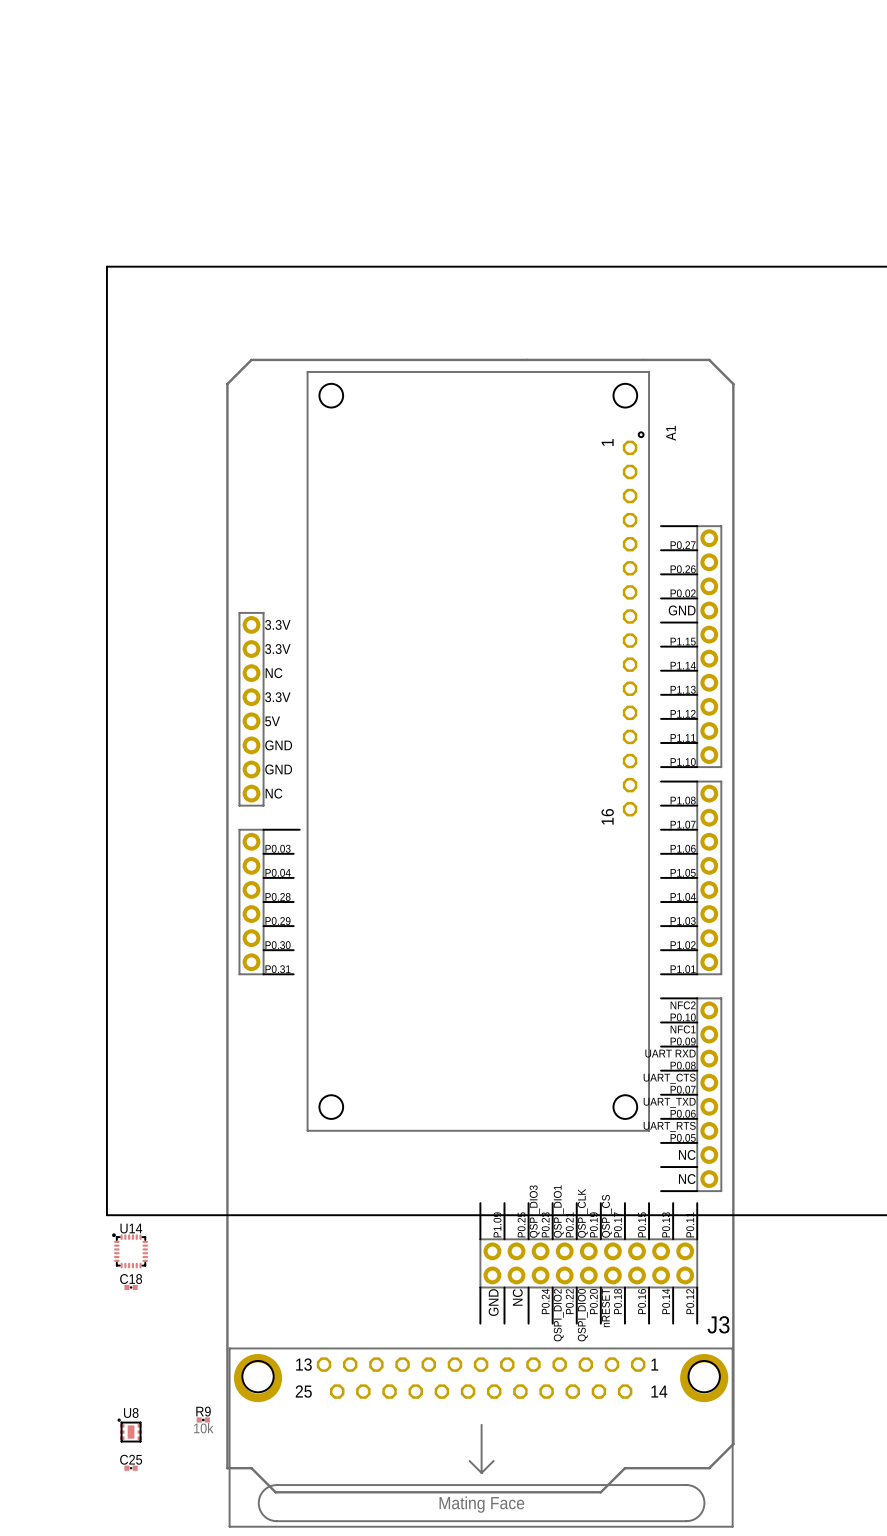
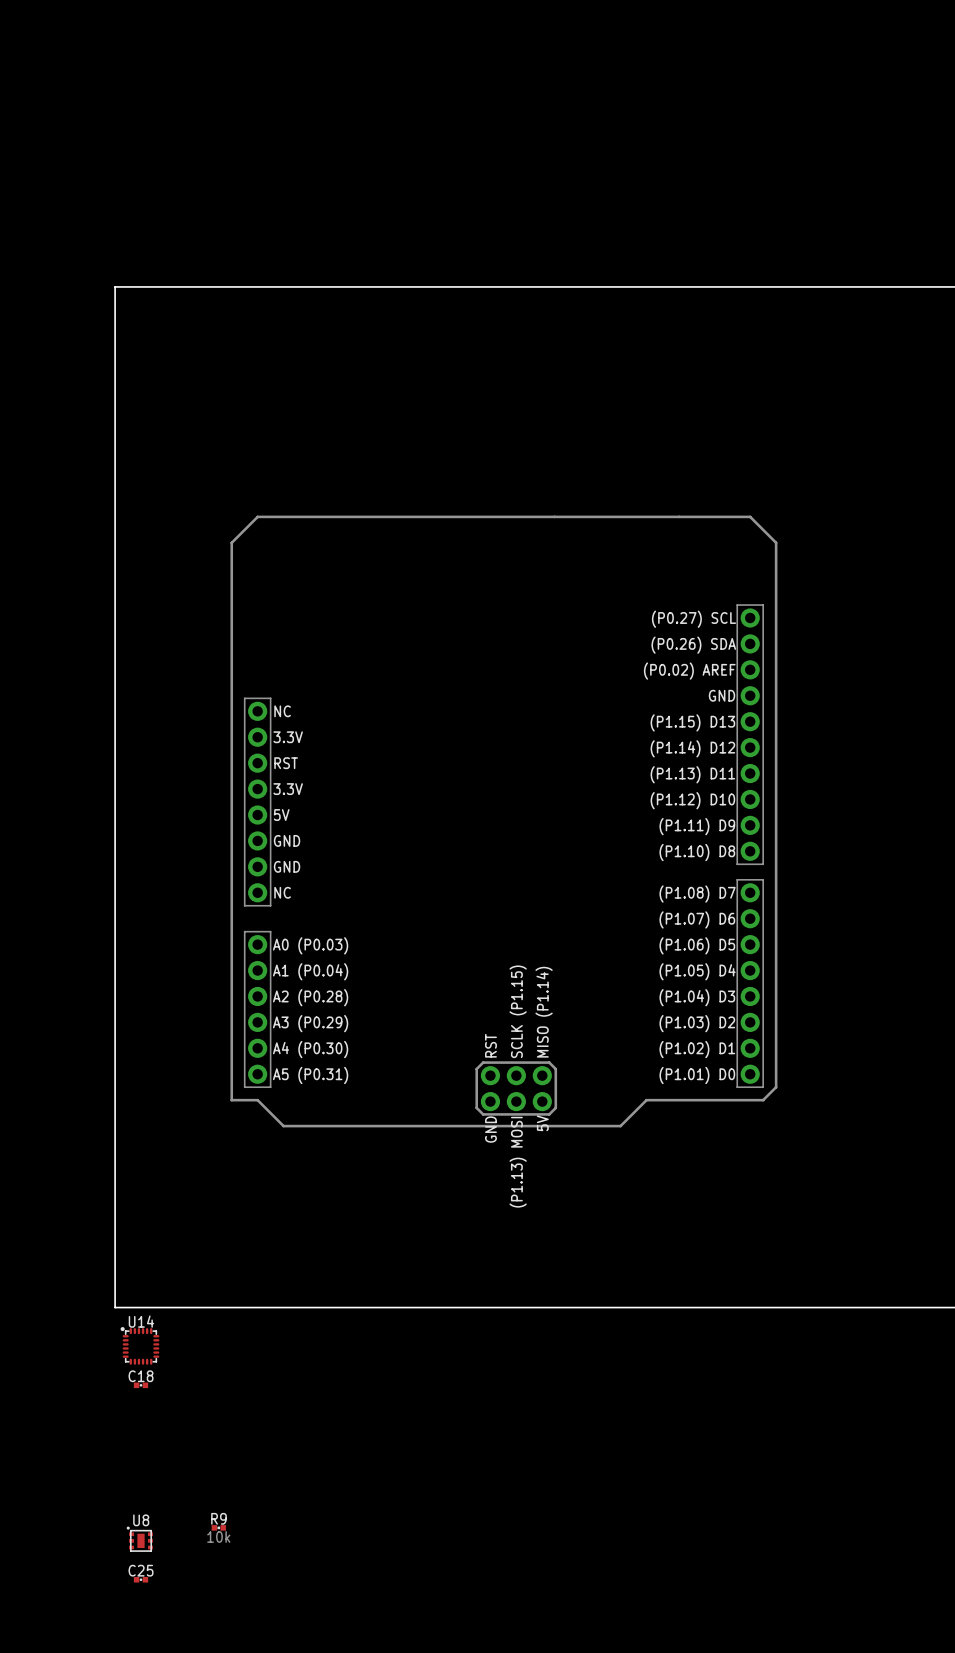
A1: (478, 751) -> none
part: none -> (503, 821)
part: (480, 926) -> none
J3: (481, 1437) -> none

